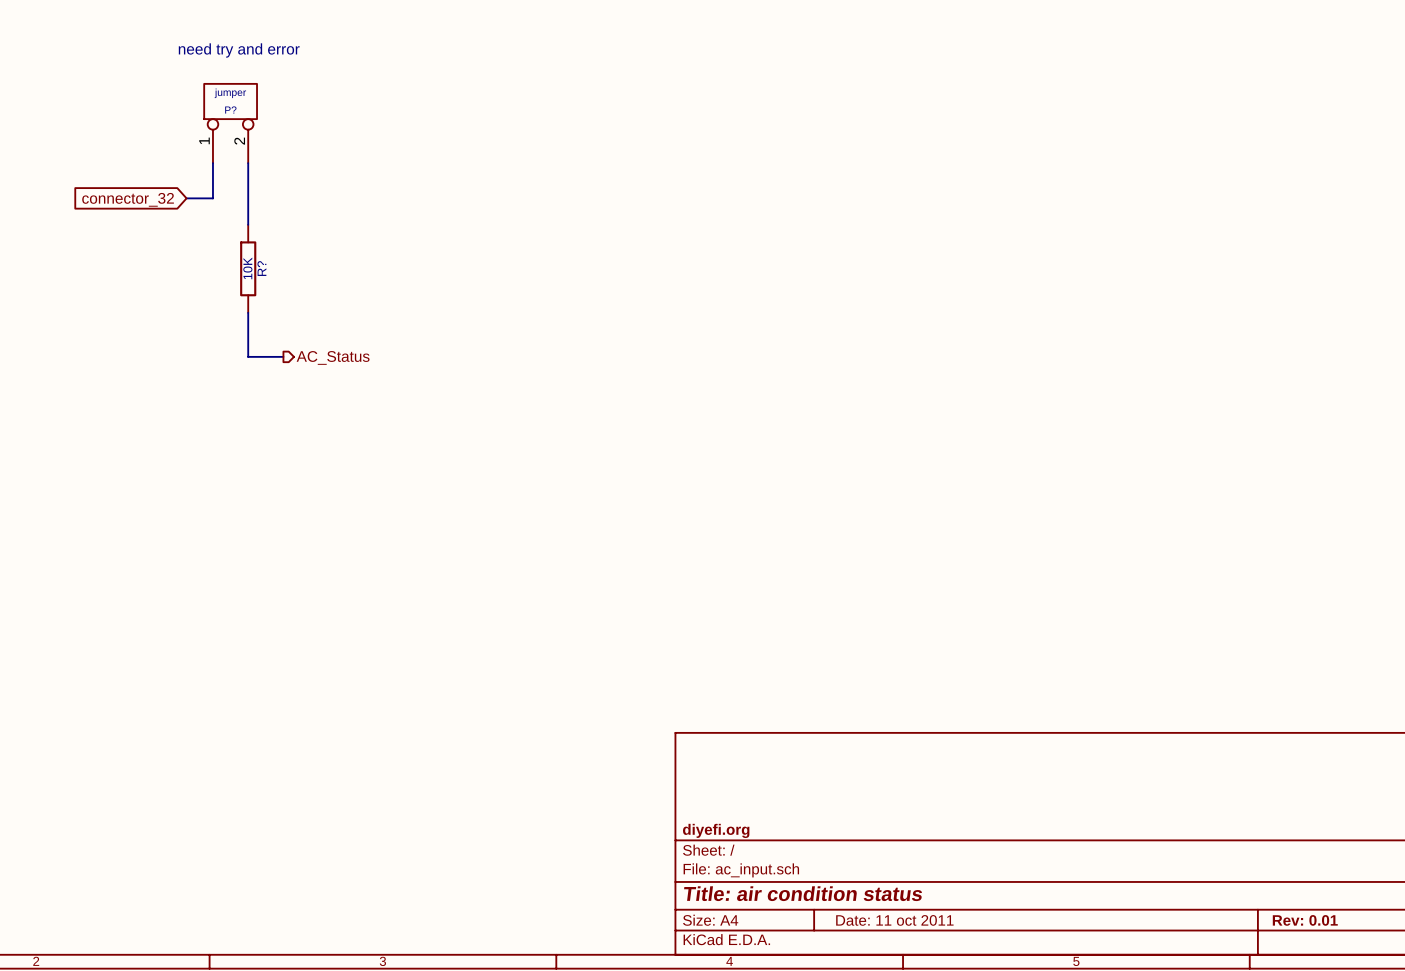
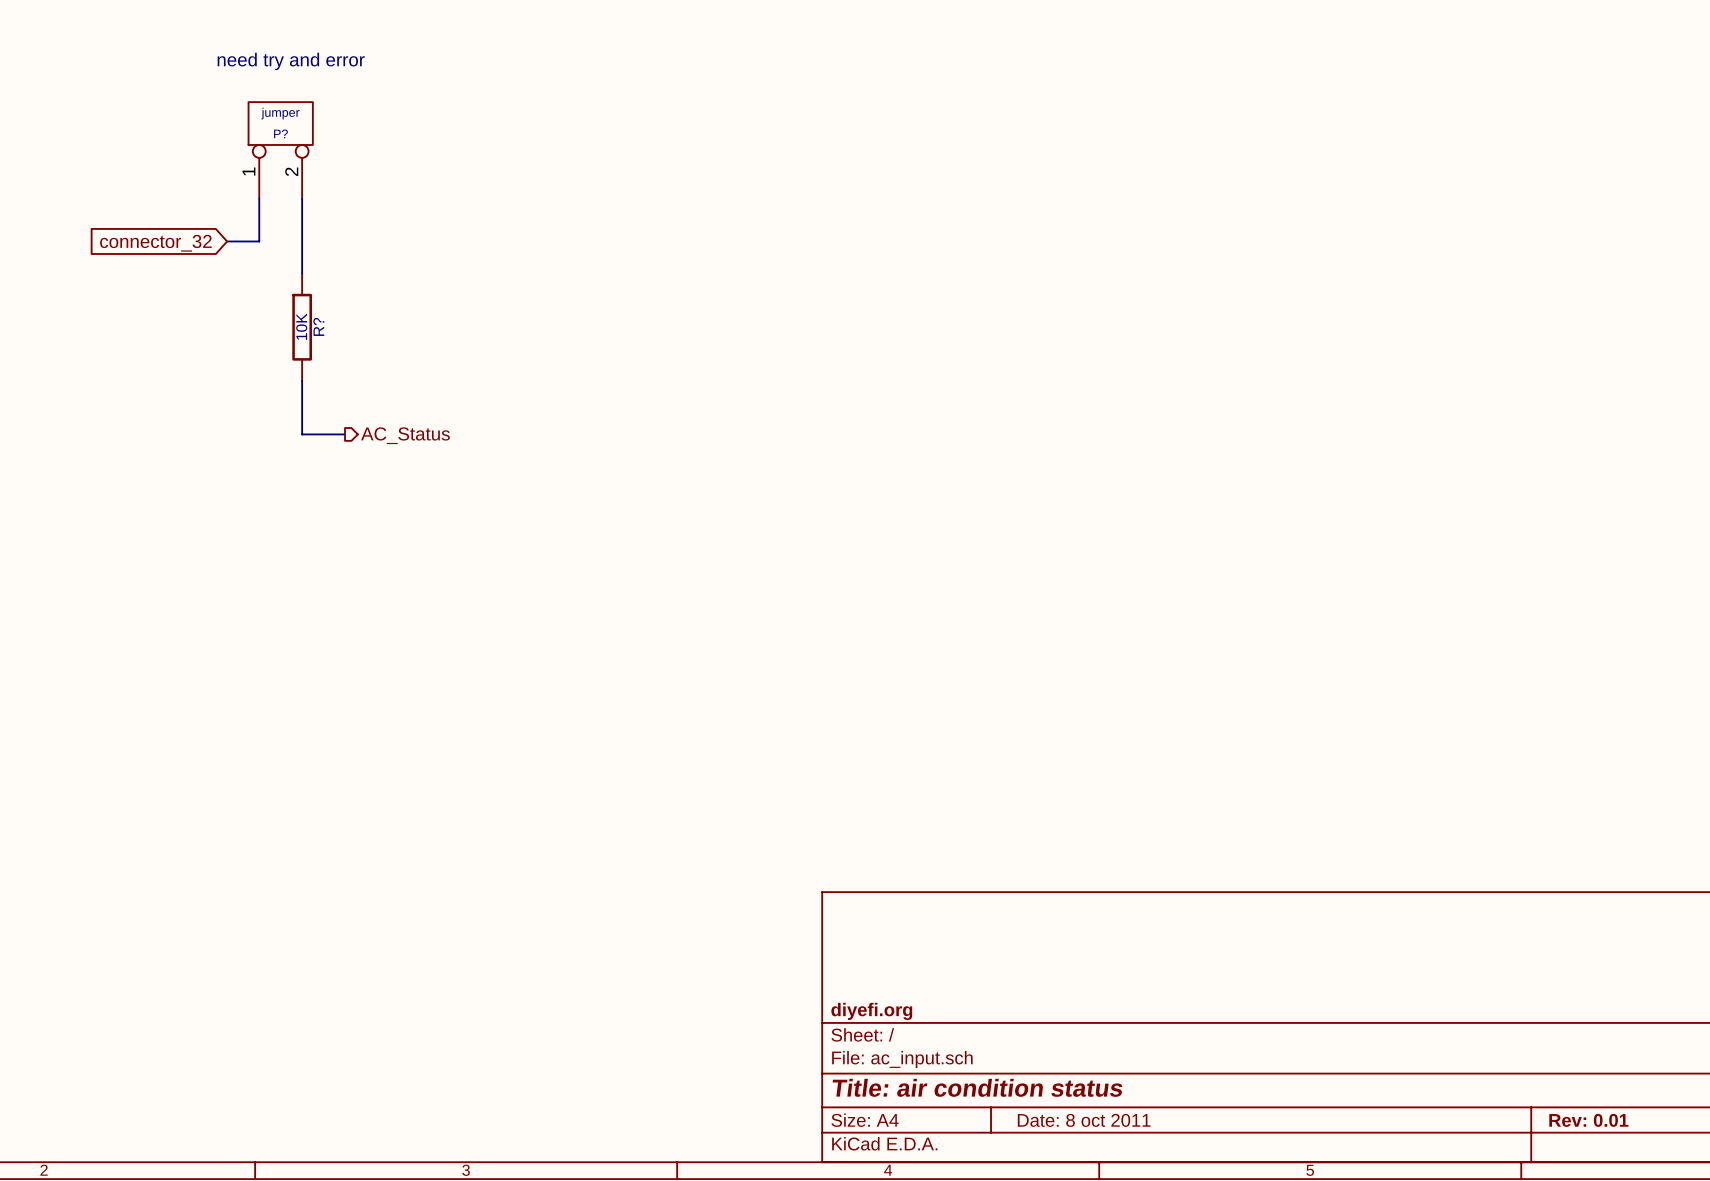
title block: Date: 11 oct 2011 (894, 920) -> Date: 8 oct 2011 (1084, 1120)

